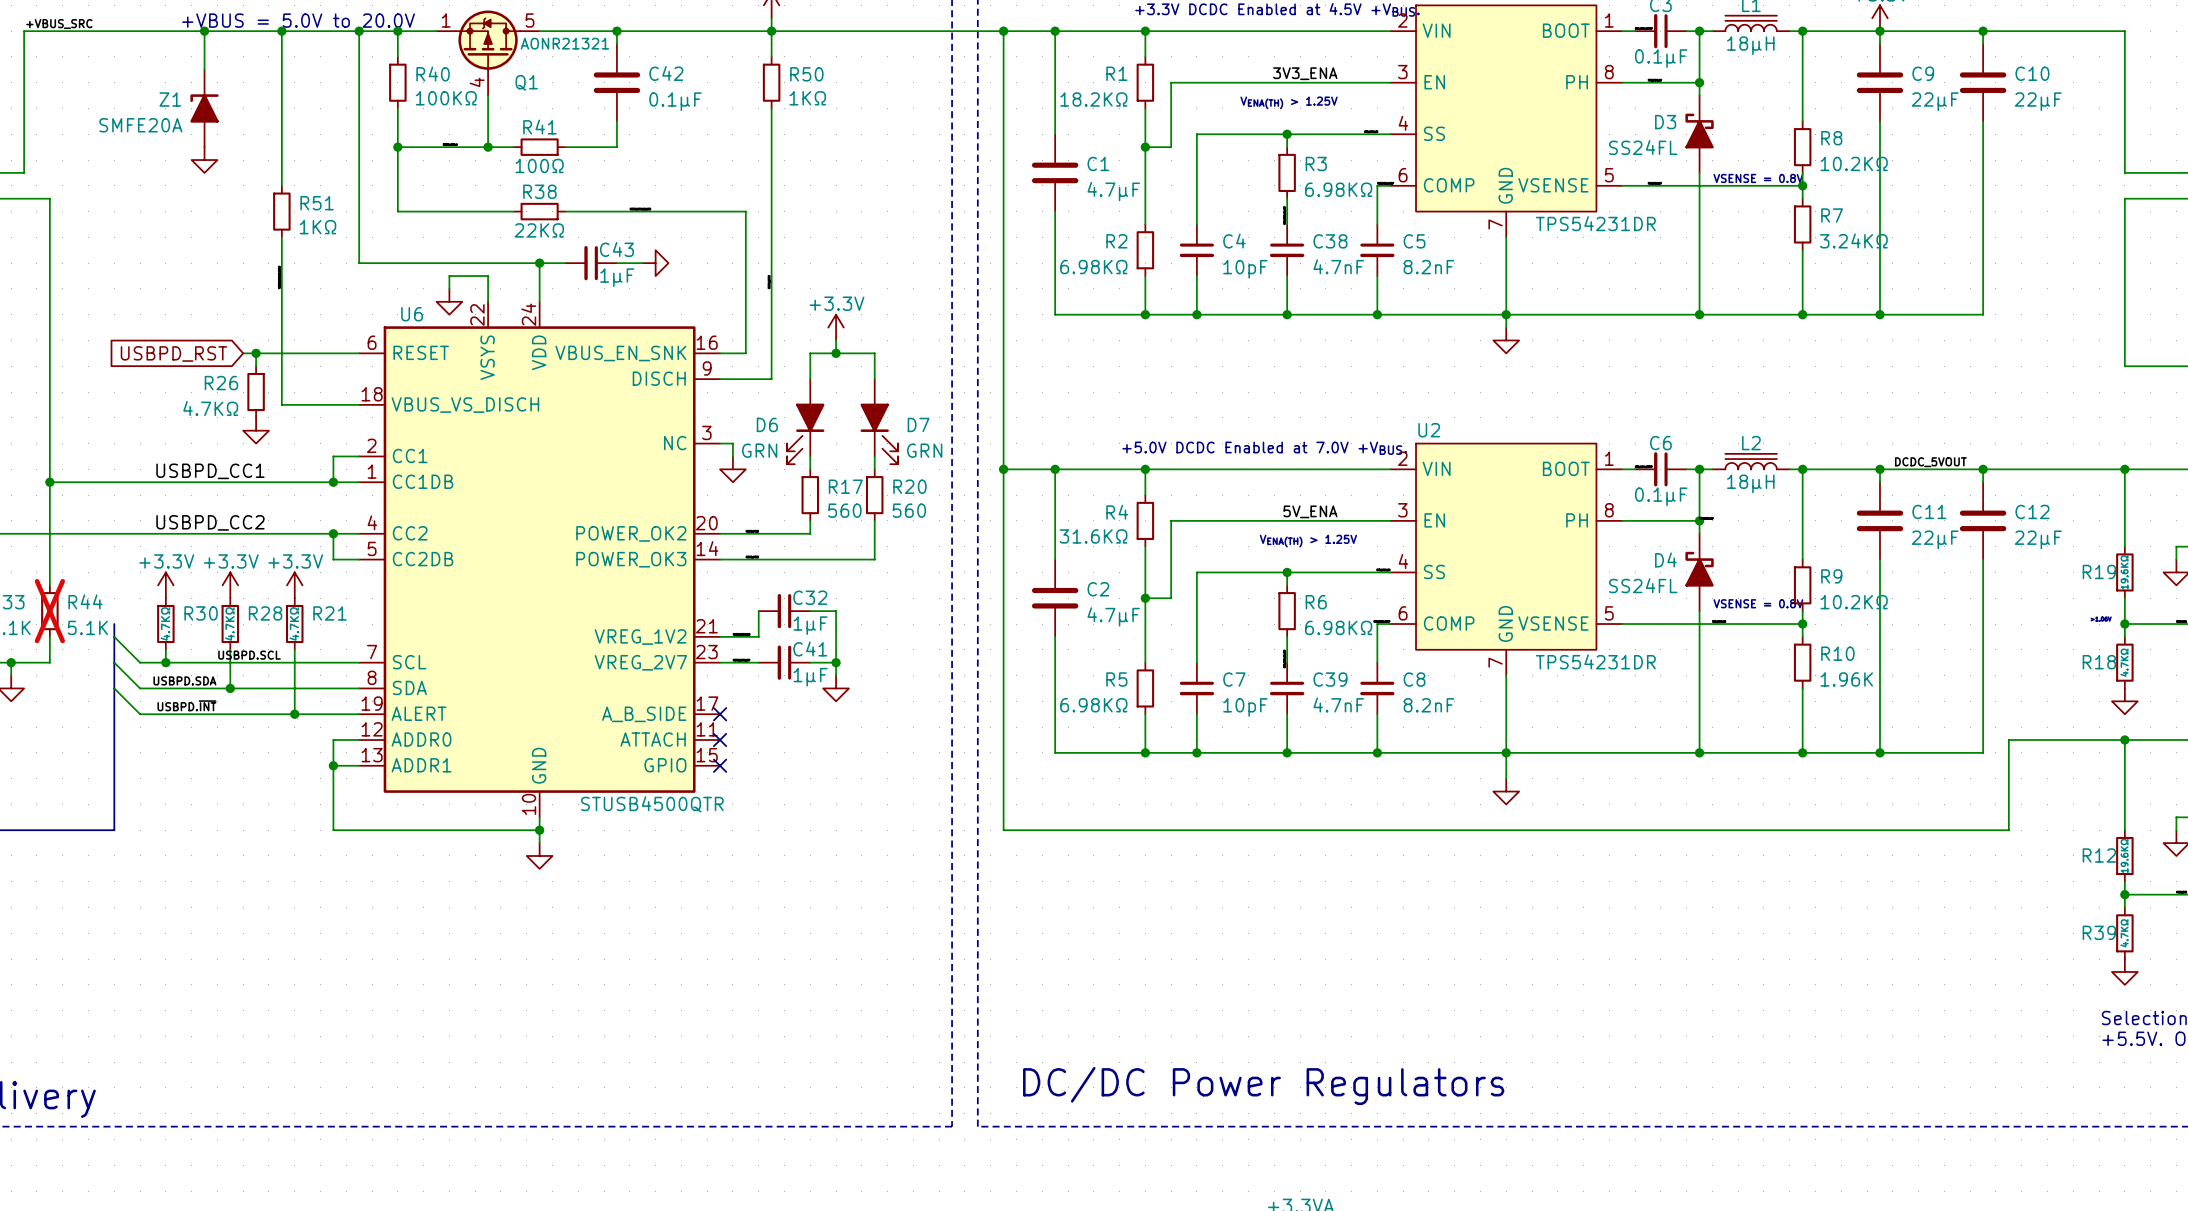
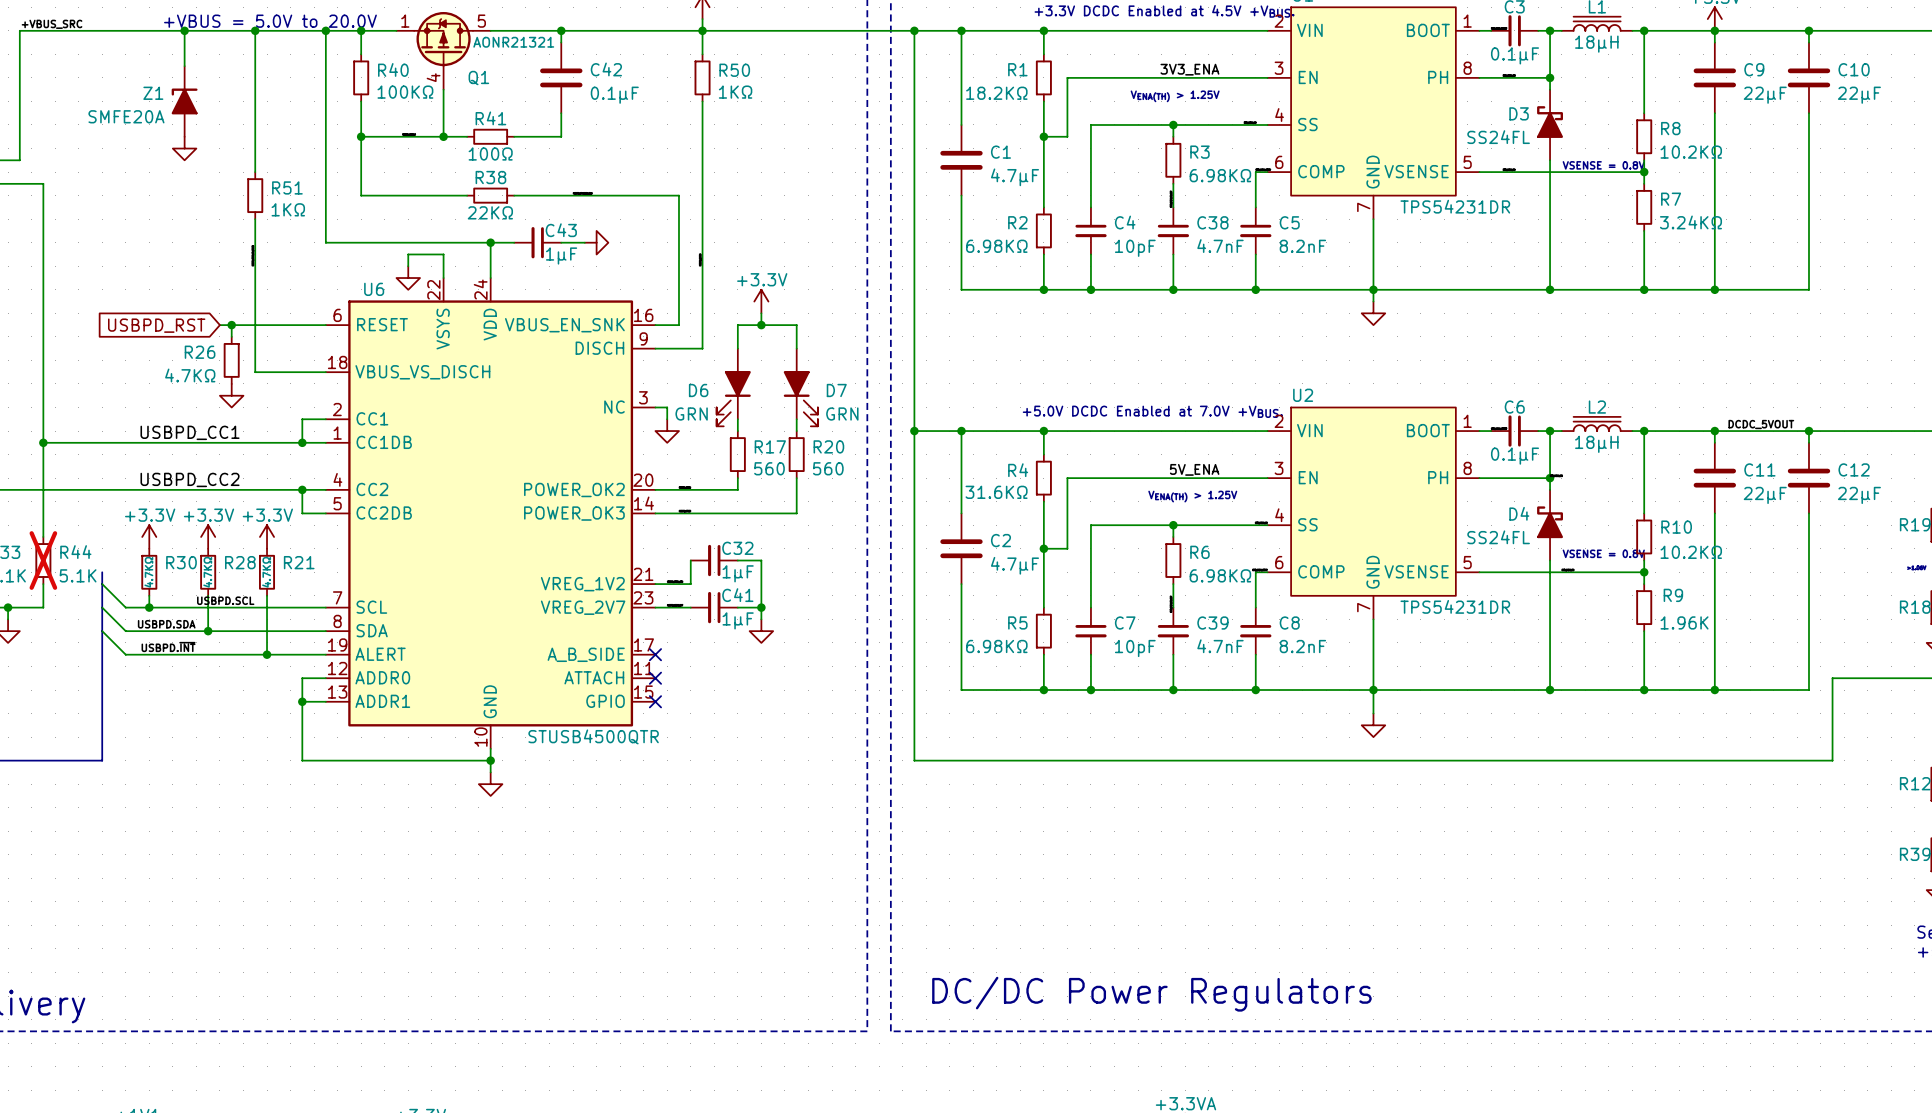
R9 name: R9 (1831, 576) -> R10 (1676, 527)
R10 name: R10 (1837, 653) -> R9 (1673, 595)

